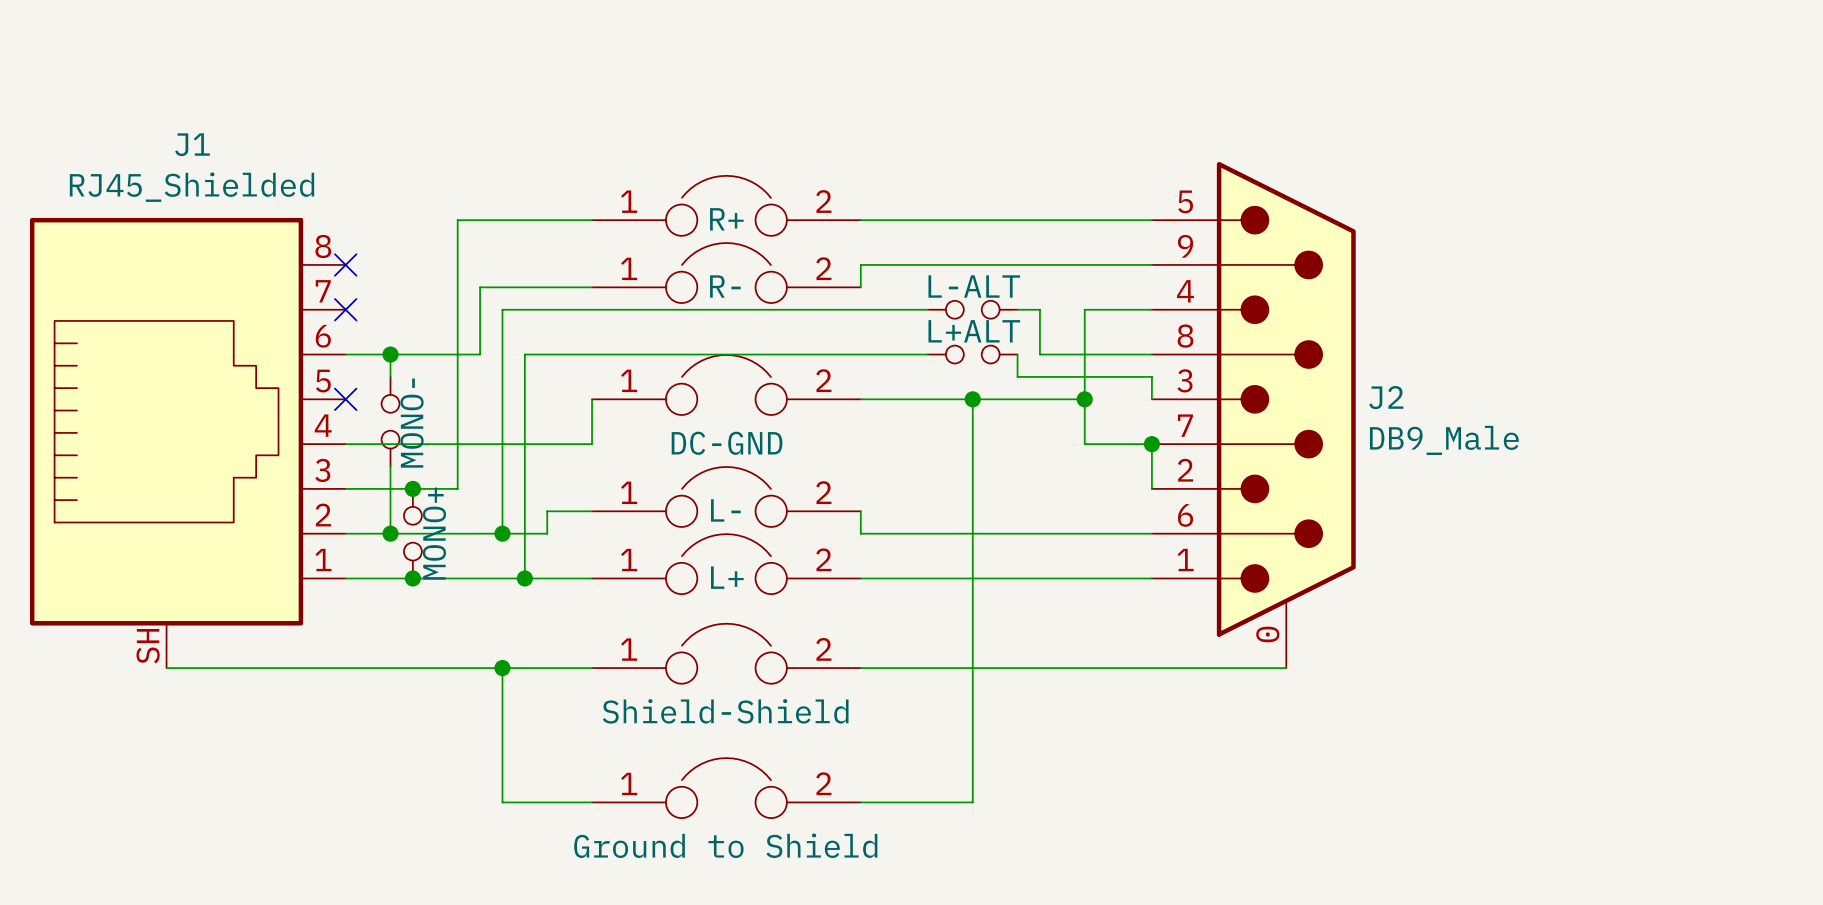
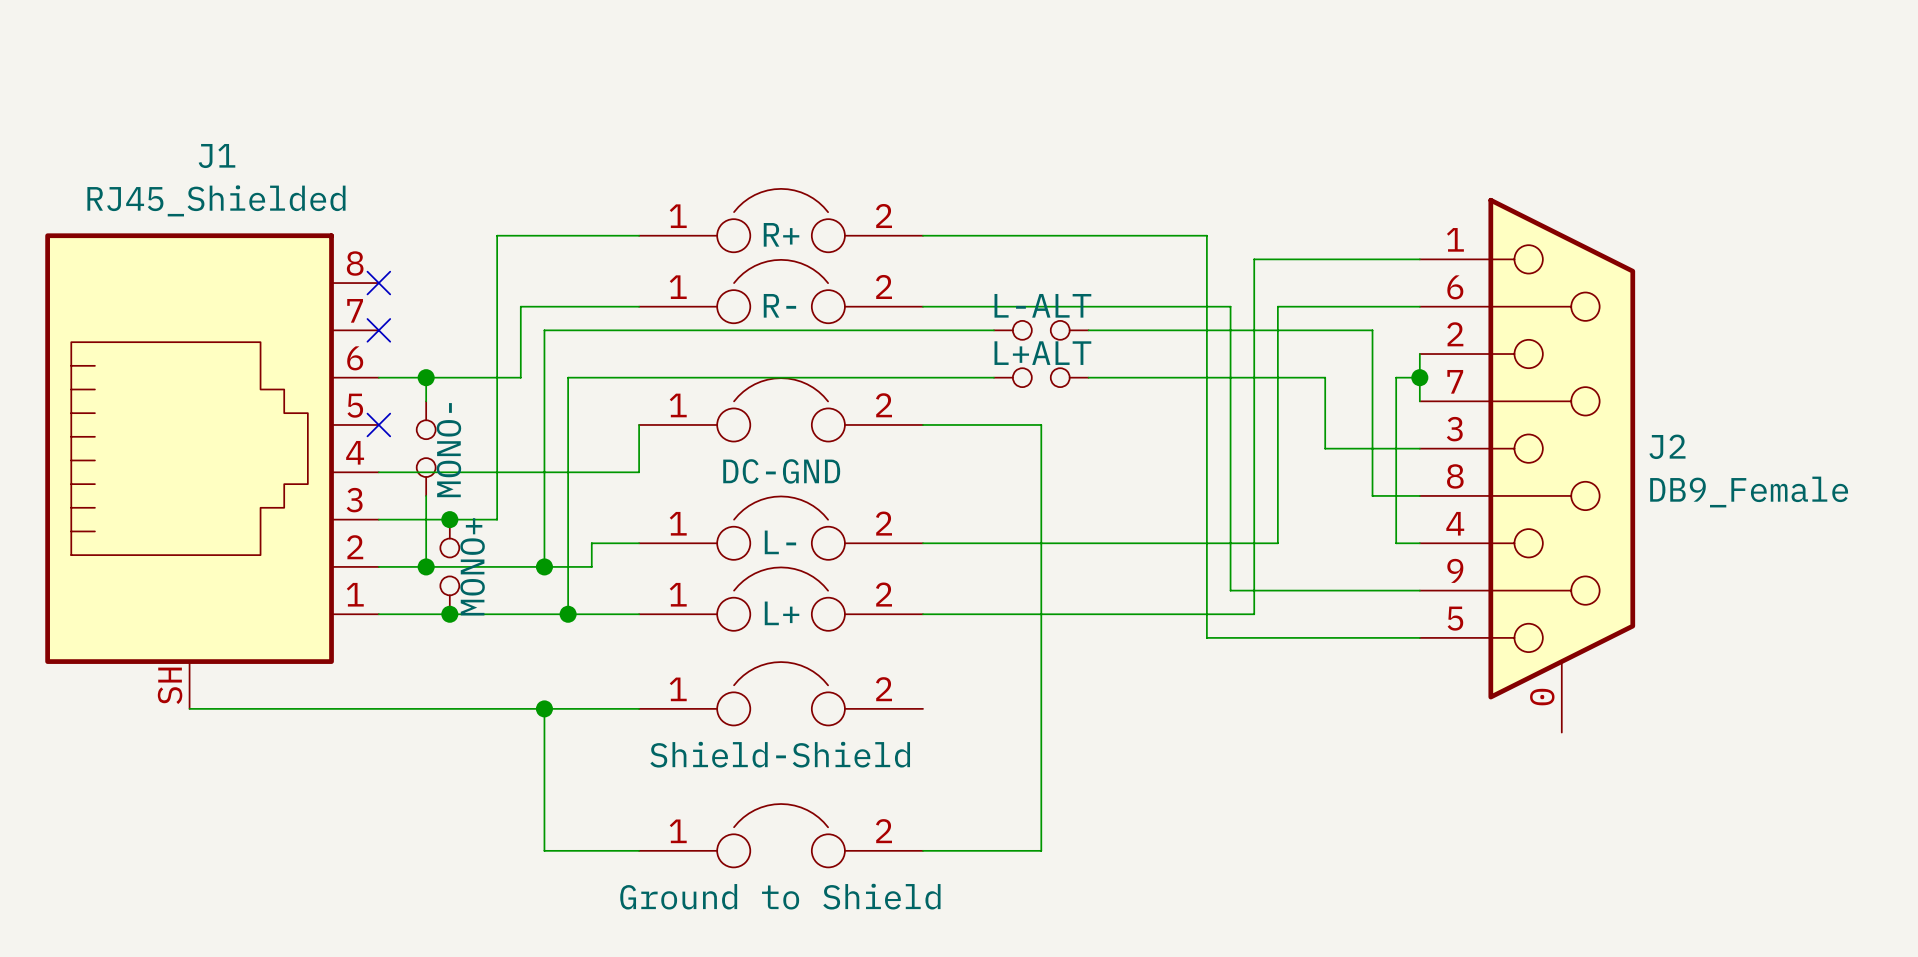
J2 symbol: [1151, 161, 1356, 669] -> [1419, 197, 1636, 733]
wire: (1129, 220) (1151, 220) -> (1206, 235) (1206, 637) (1419, 637)
wire: none -> (1419, 259) (1254, 259) (1254, 614) (1230, 614)
wire: (1151, 264) (860, 264) (860, 287) -> (1230, 401) (1230, 306) (923, 306)
wire: (1039, 309) (1039, 354) -> (1088, 377) (1112, 377)
wire: none -> (1112, 330) (1159, 330)
wire: (1084, 309) (1084, 444) (1151, 444) -> (1230, 424) (1230, 472)
wire: (1017, 354) (1017, 376) (1151, 376) -> none
junction: none -> (1419, 377)
wire: (972, 399) (1084, 399) -> none
junction: (972, 399) -> none
junction: (1084, 399) -> none
J2 value: DB9_Male (1444, 440) -> DB9_Female (1749, 492)
junction: (1151, 444) -> none
wire: none -> (1230, 519) (1230, 590) (1419, 590)
wire: (860, 511) (860, 533) (1151, 533) -> (923, 543) (1277, 543) (1277, 306) (1419, 306)
wire: (860, 668) (1286, 668) -> none

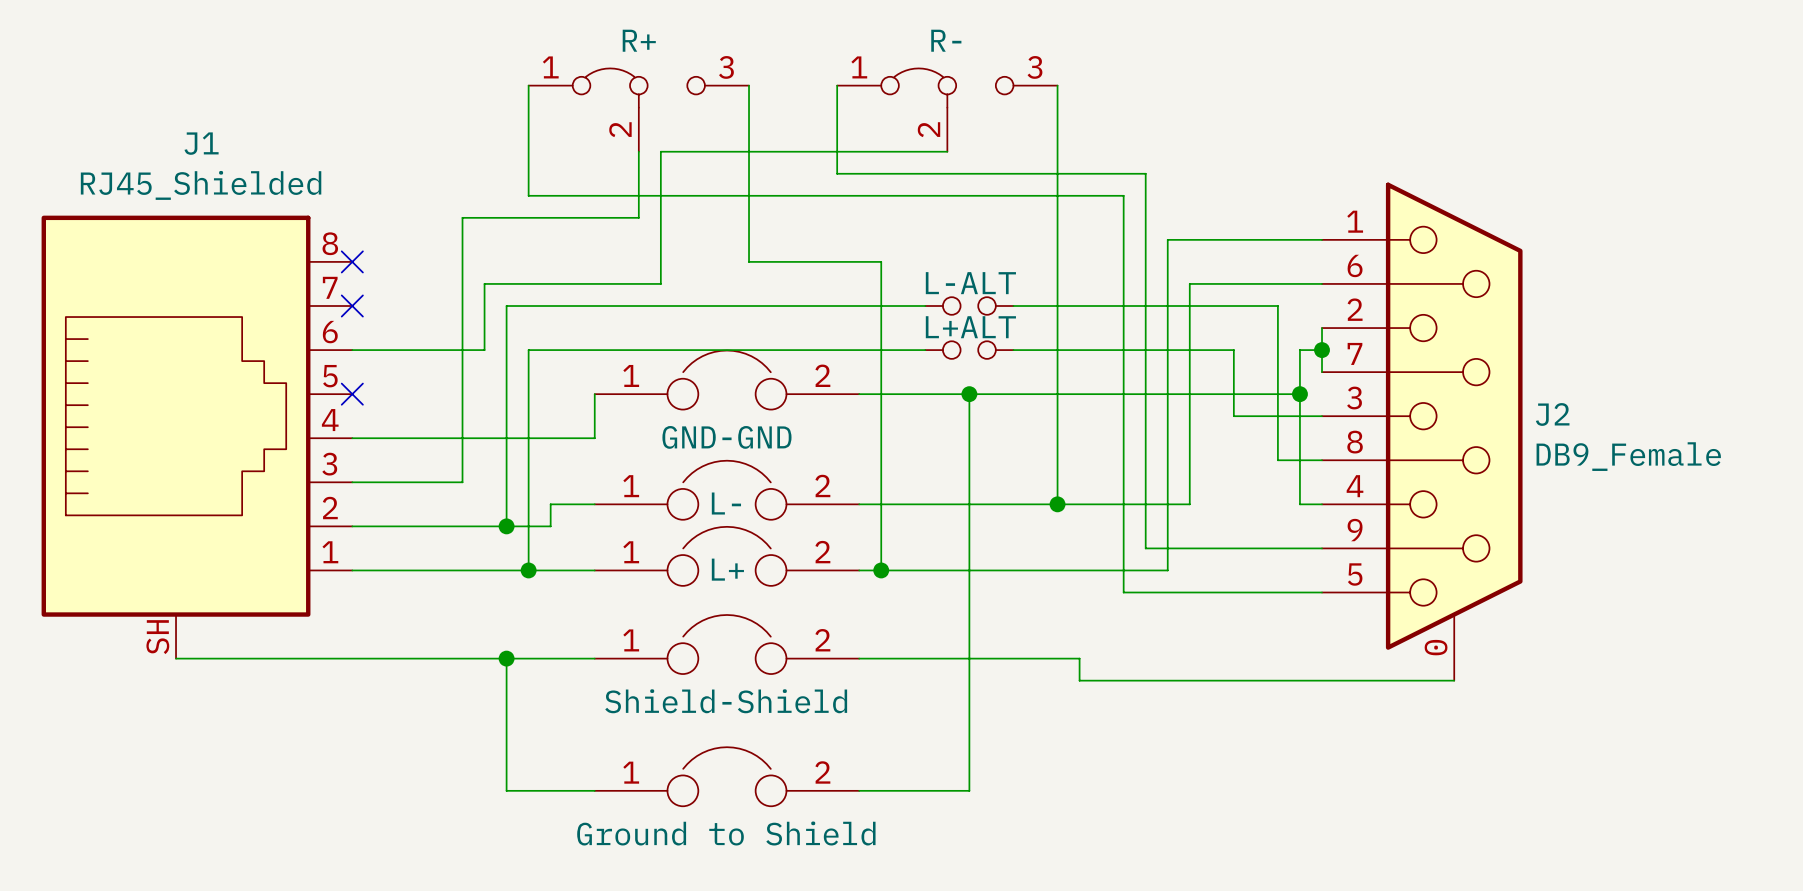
wire: none -> (749, 85) (749, 261) (881, 261) (881, 570)
wire: none -> (1057, 85) (1057, 504)
part: none -> R+ (638, 110)
part: none -> R- (947, 110)
wire: none -> (638, 151) (638, 217) (594, 217)
wire: none -> (947, 151) (660, 151) (660, 283) (594, 283)
part: R+ (781, 220) -> none
wire: (923, 235) (1206, 235) -> (528, 85) (528, 195) (1123, 195) (1123, 217)
part: R- (781, 291) -> none
wire: (923, 306) (1230, 306) -> (837, 85) (837, 173) (1145, 173) (1145, 283)
wire: (426, 377) (426, 401) -> none
junction: (426, 377) -> none
wire: none -> (969, 394) (1299, 394)
junction: none -> (969, 394)
junction: none -> (1299, 394)
part: MONO- (426, 448) -> none
part value: DC-GND (781, 471) -> GND-GND (726, 437)
wire: (426, 495) (426, 566) -> none
junction: (449, 519) -> none
junction: none -> (1057, 504)
junction: (426, 566) -> none
part: MONO+ (449, 566) -> none
junction: (449, 614) -> none
junction: none -> (881, 570)
wire: none -> (859, 658) (1079, 658) (1079, 680) (1454, 680)

